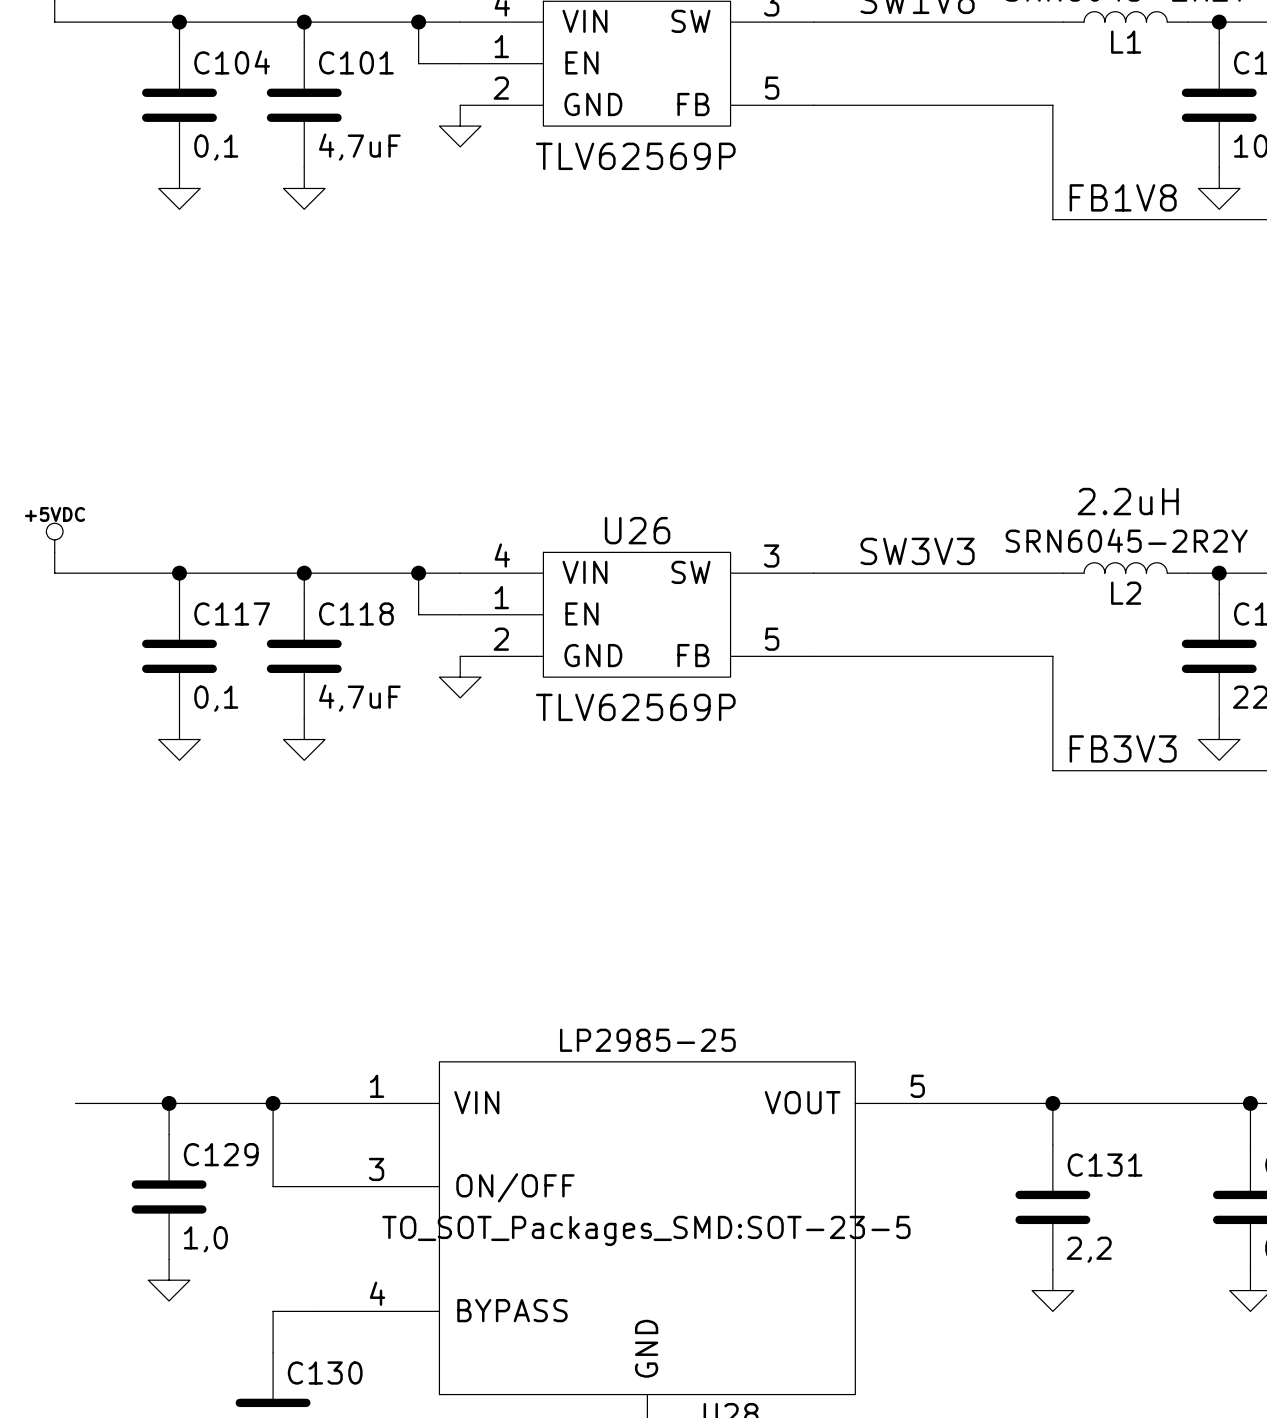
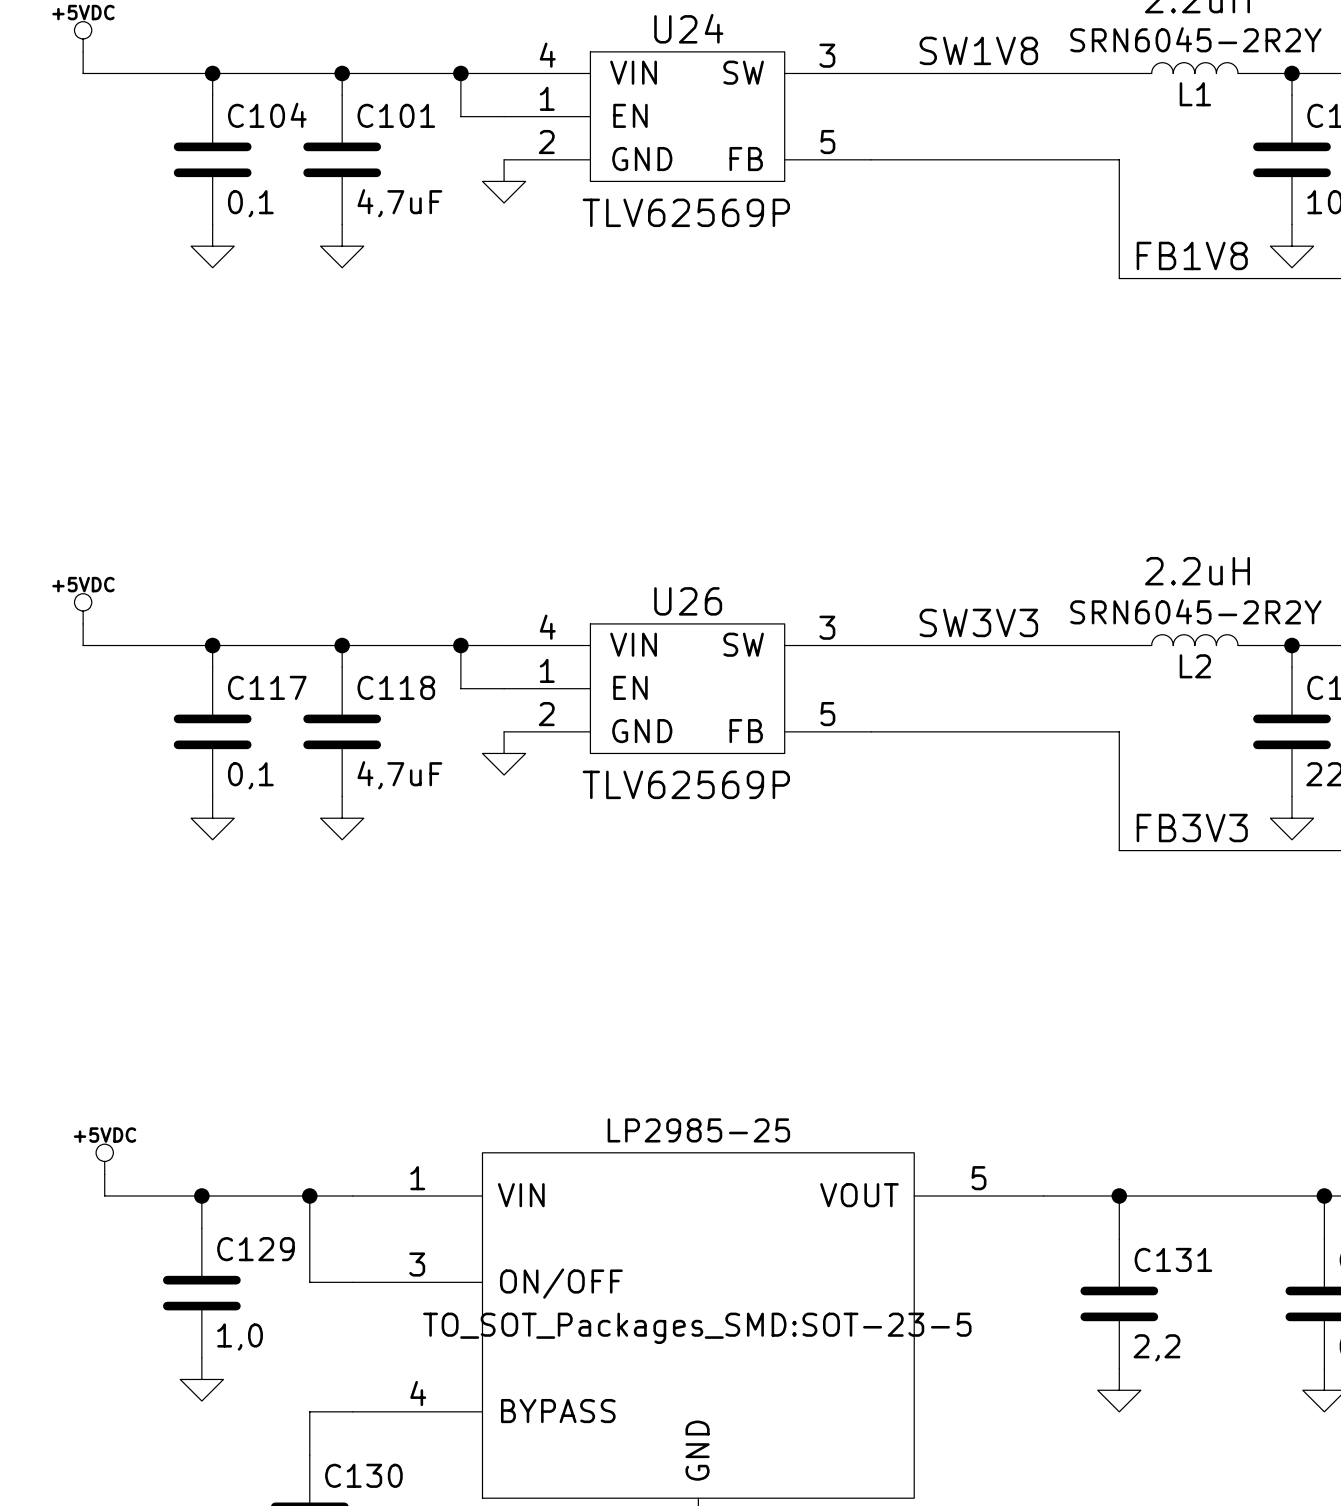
power symbol: none -> +5VDC (104, 1159)
wire: none -> (104, 1174) (104, 1195)

